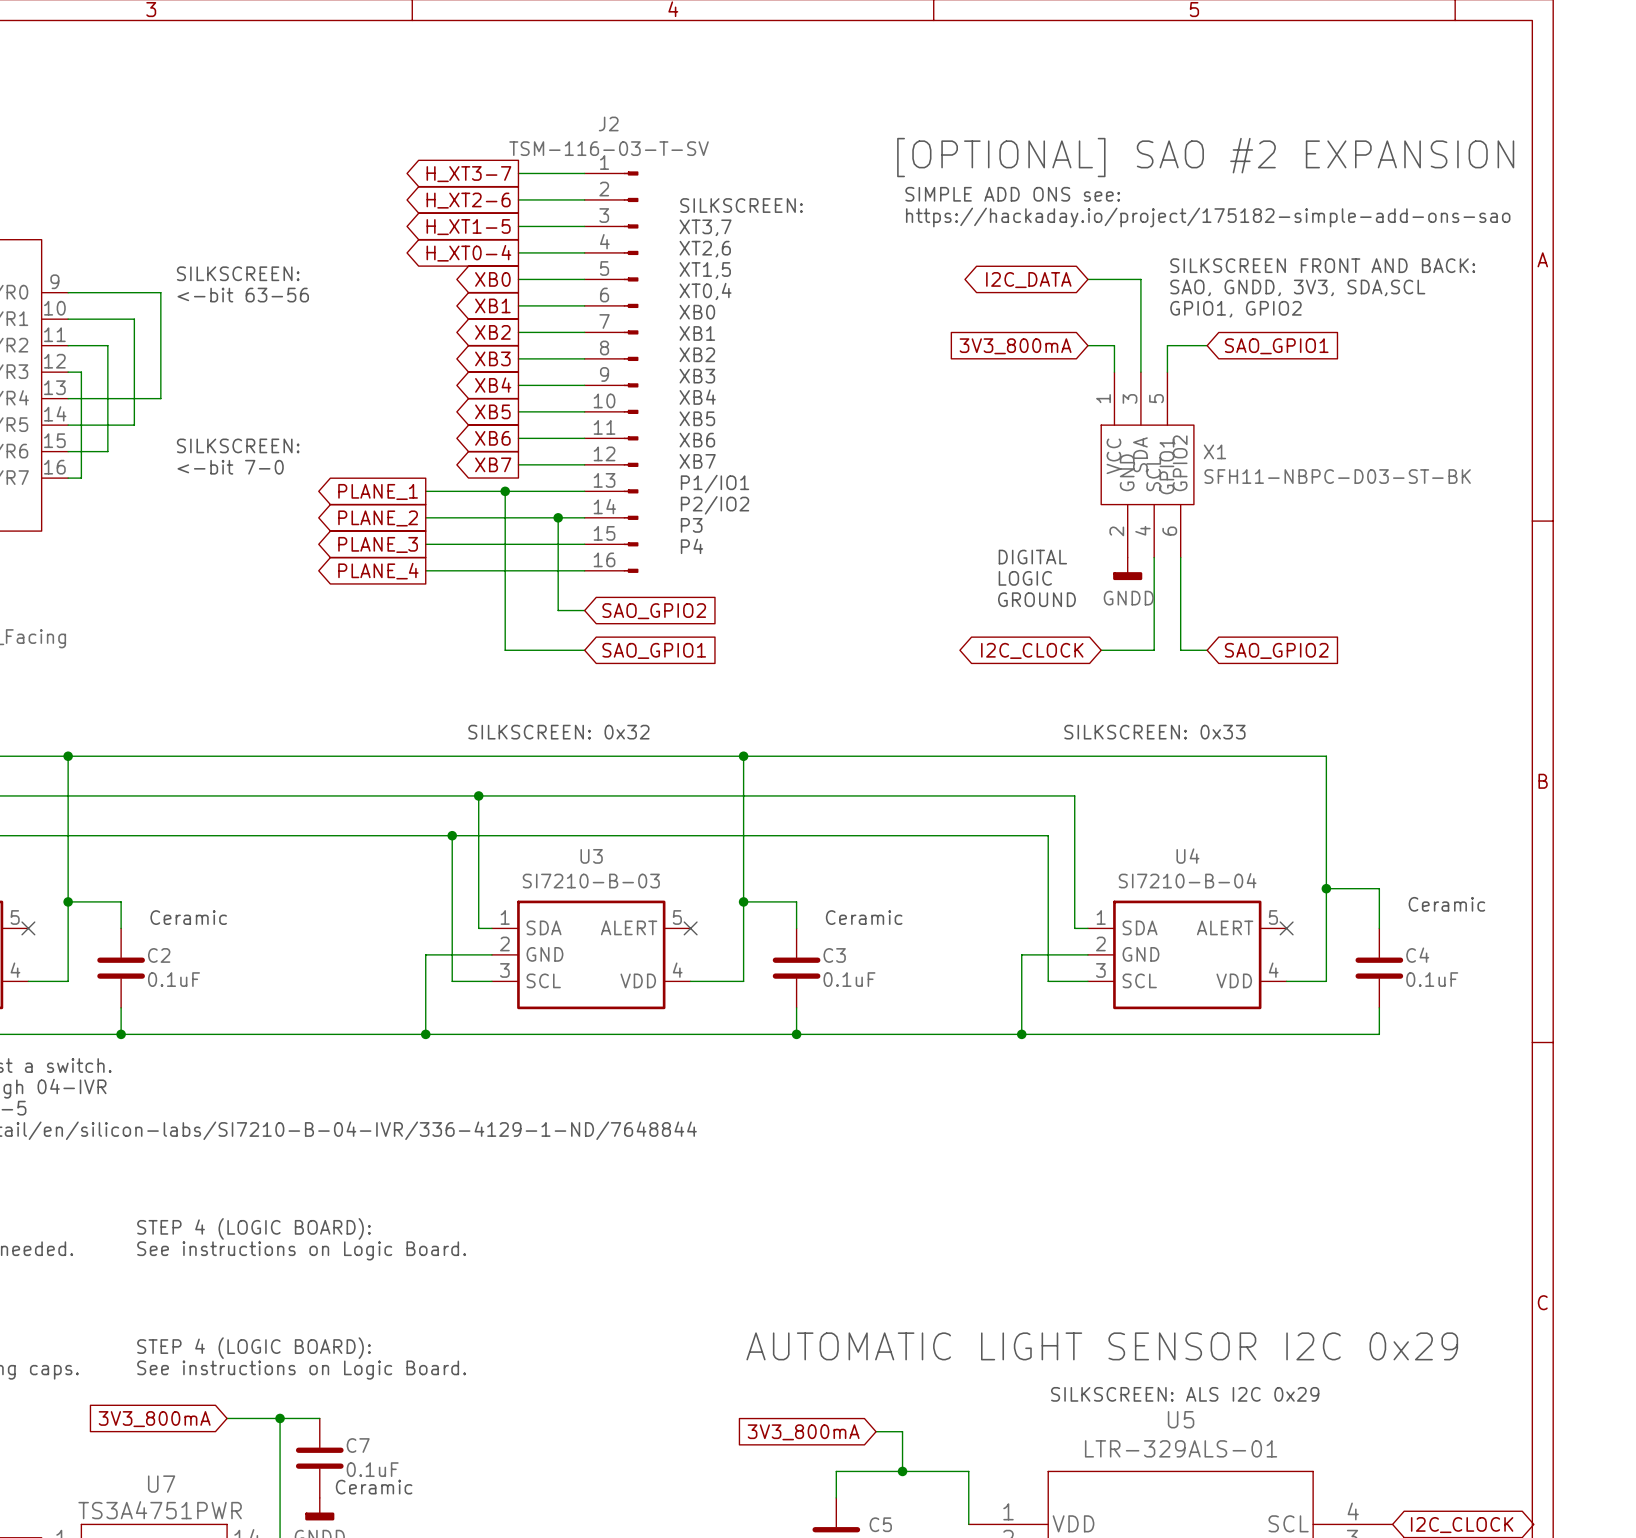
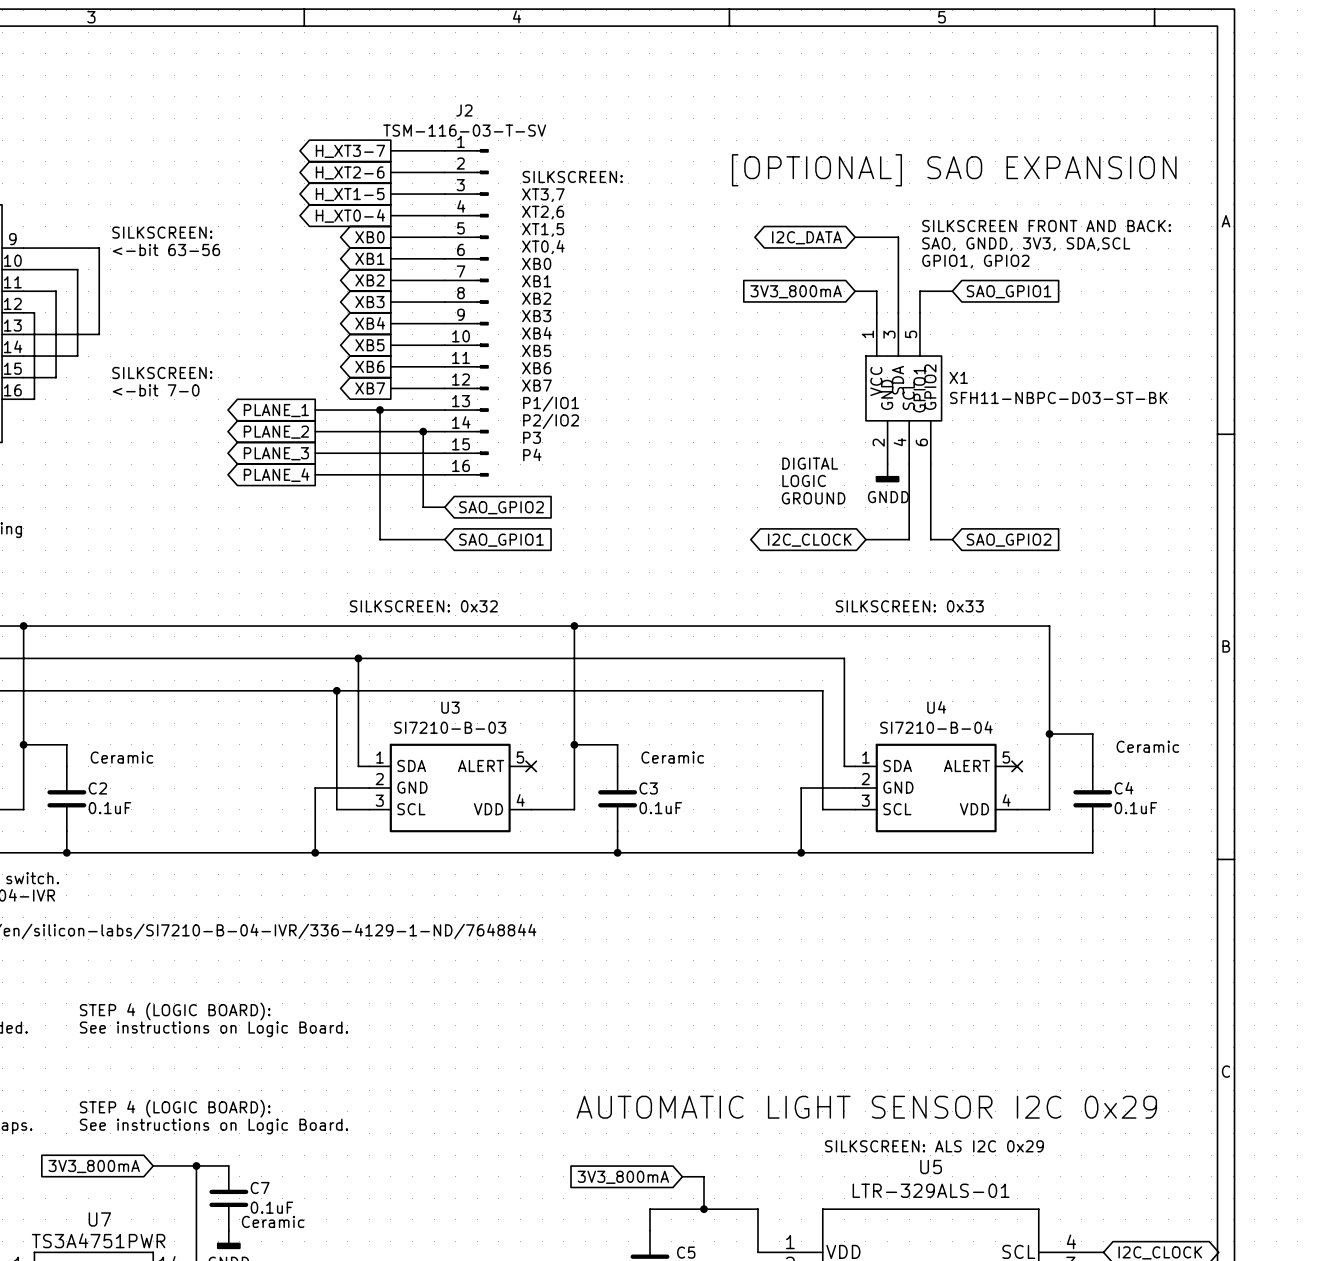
text: [OPTIONAL] SAO #2 EXPANSION (1205, 157) -> [OPTIONAL] SAO EXPANSION (954, 170)
text: SIMPLE ADD ONS see: (1012, 194) -> none
text: https://hackaday.io/project/175182-simple-add-ons-sao (1208, 217) -> none

